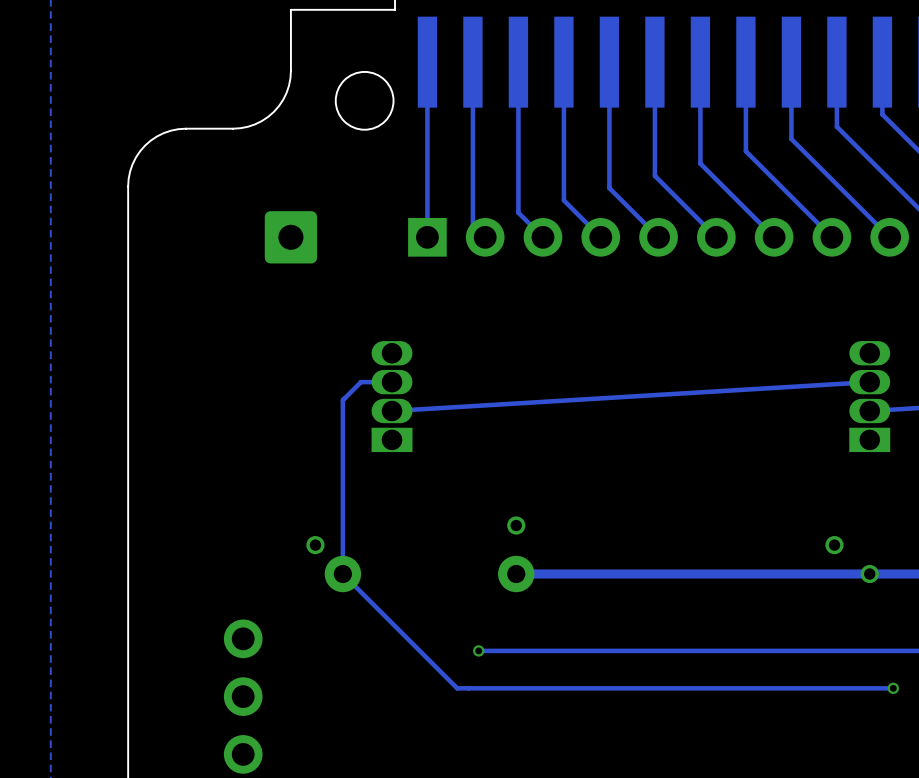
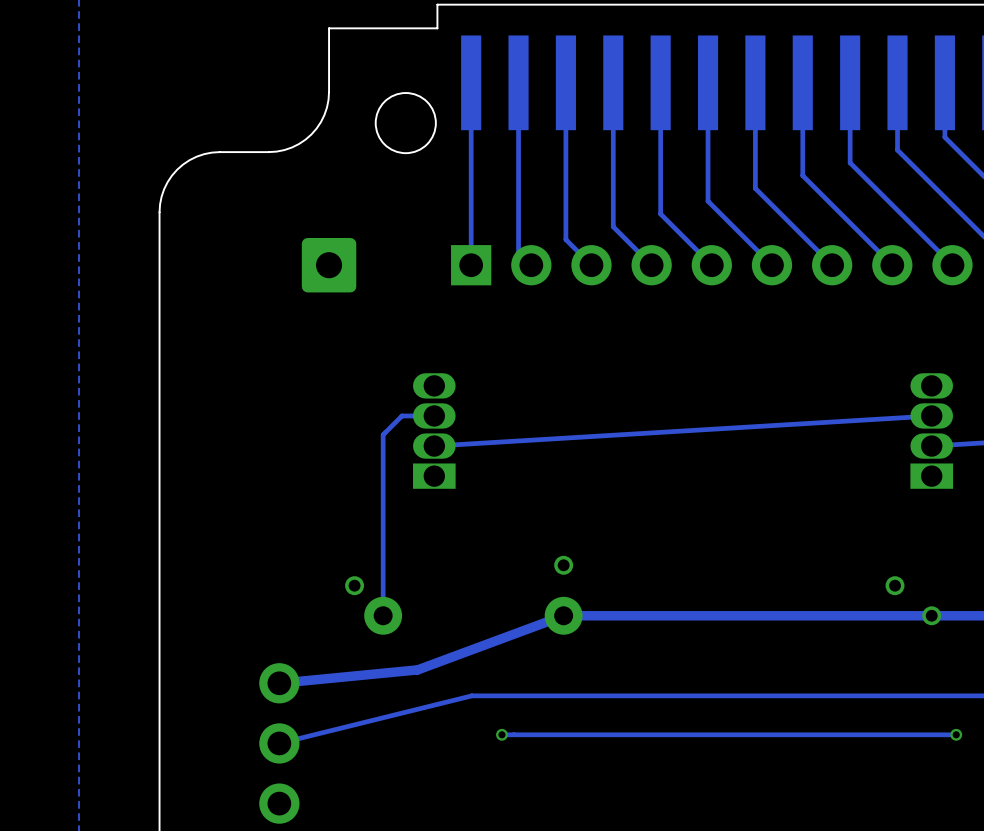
track: (342, 574) (457, 688) -> none
track: none -> (563, 615) (417, 669) (279, 683)
track: none -> (524, 695) (471, 695) (279, 743)
via position: (478, 650) -> (501, 734)

